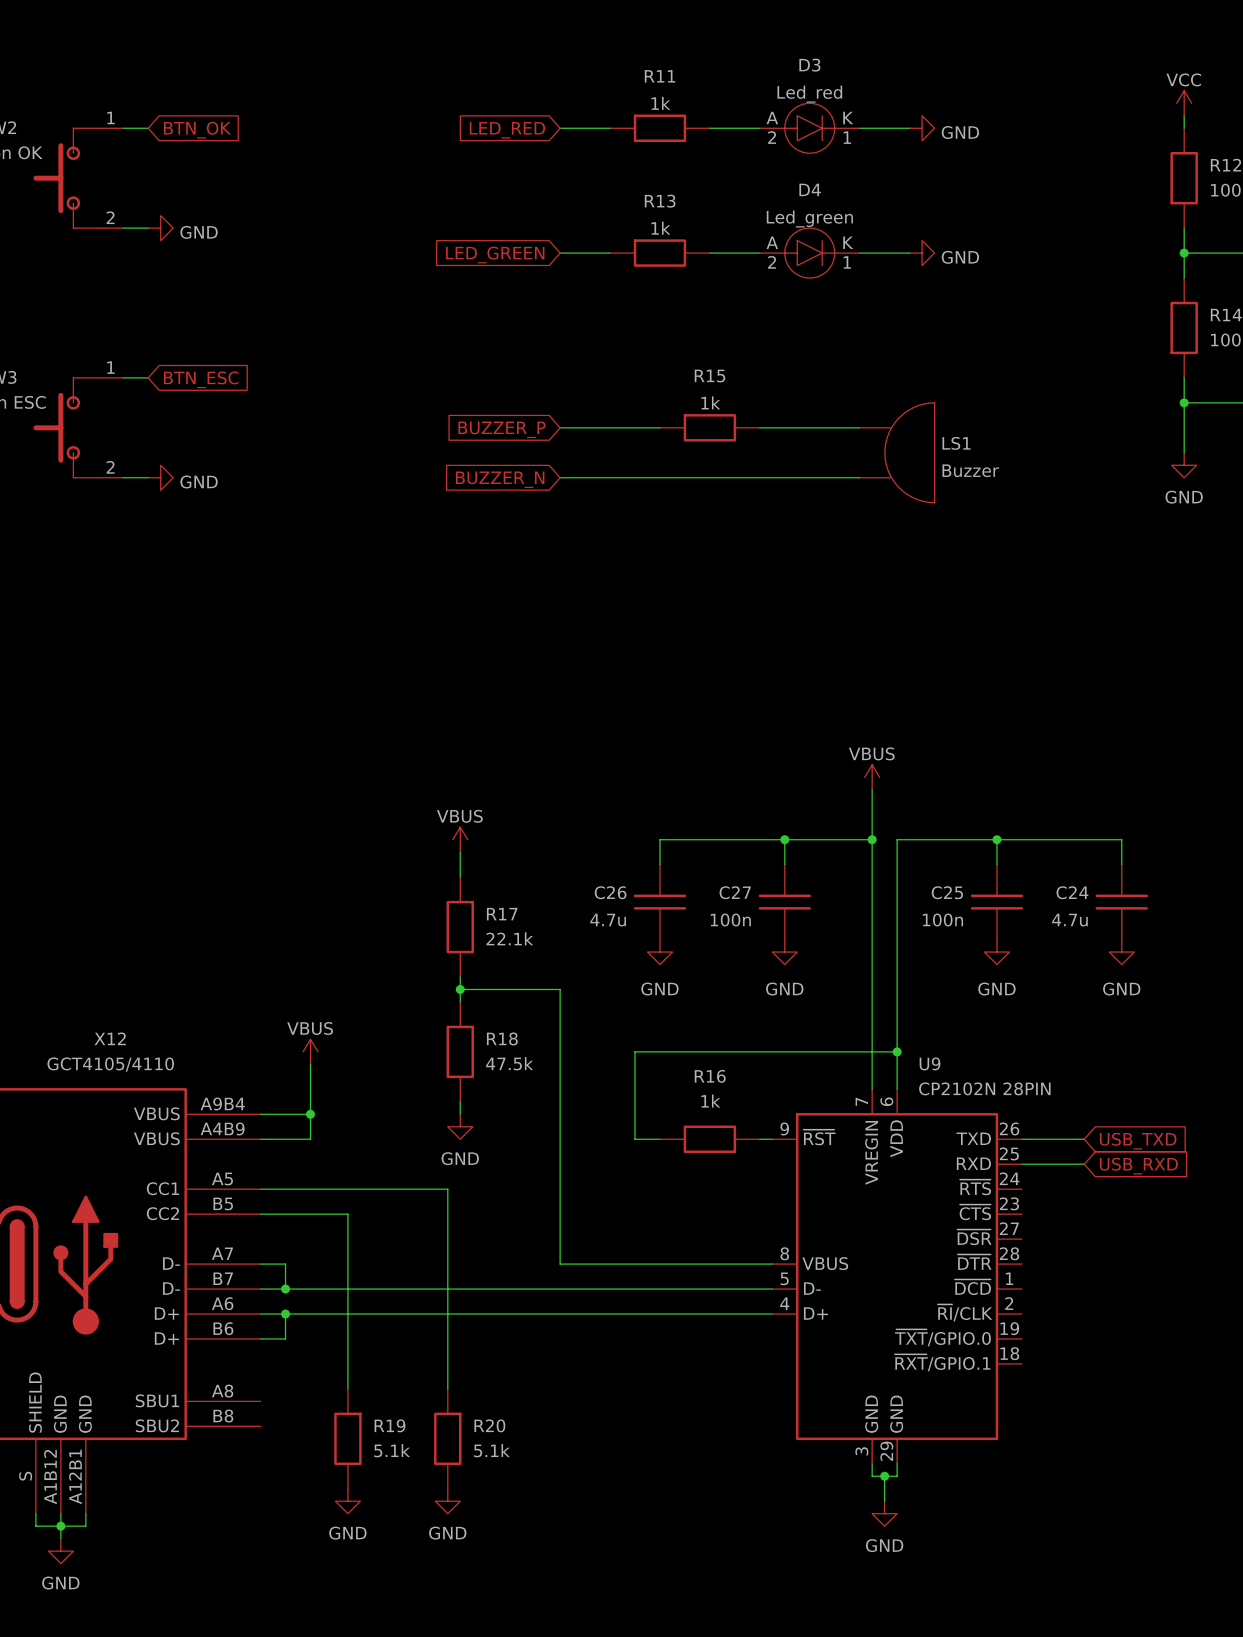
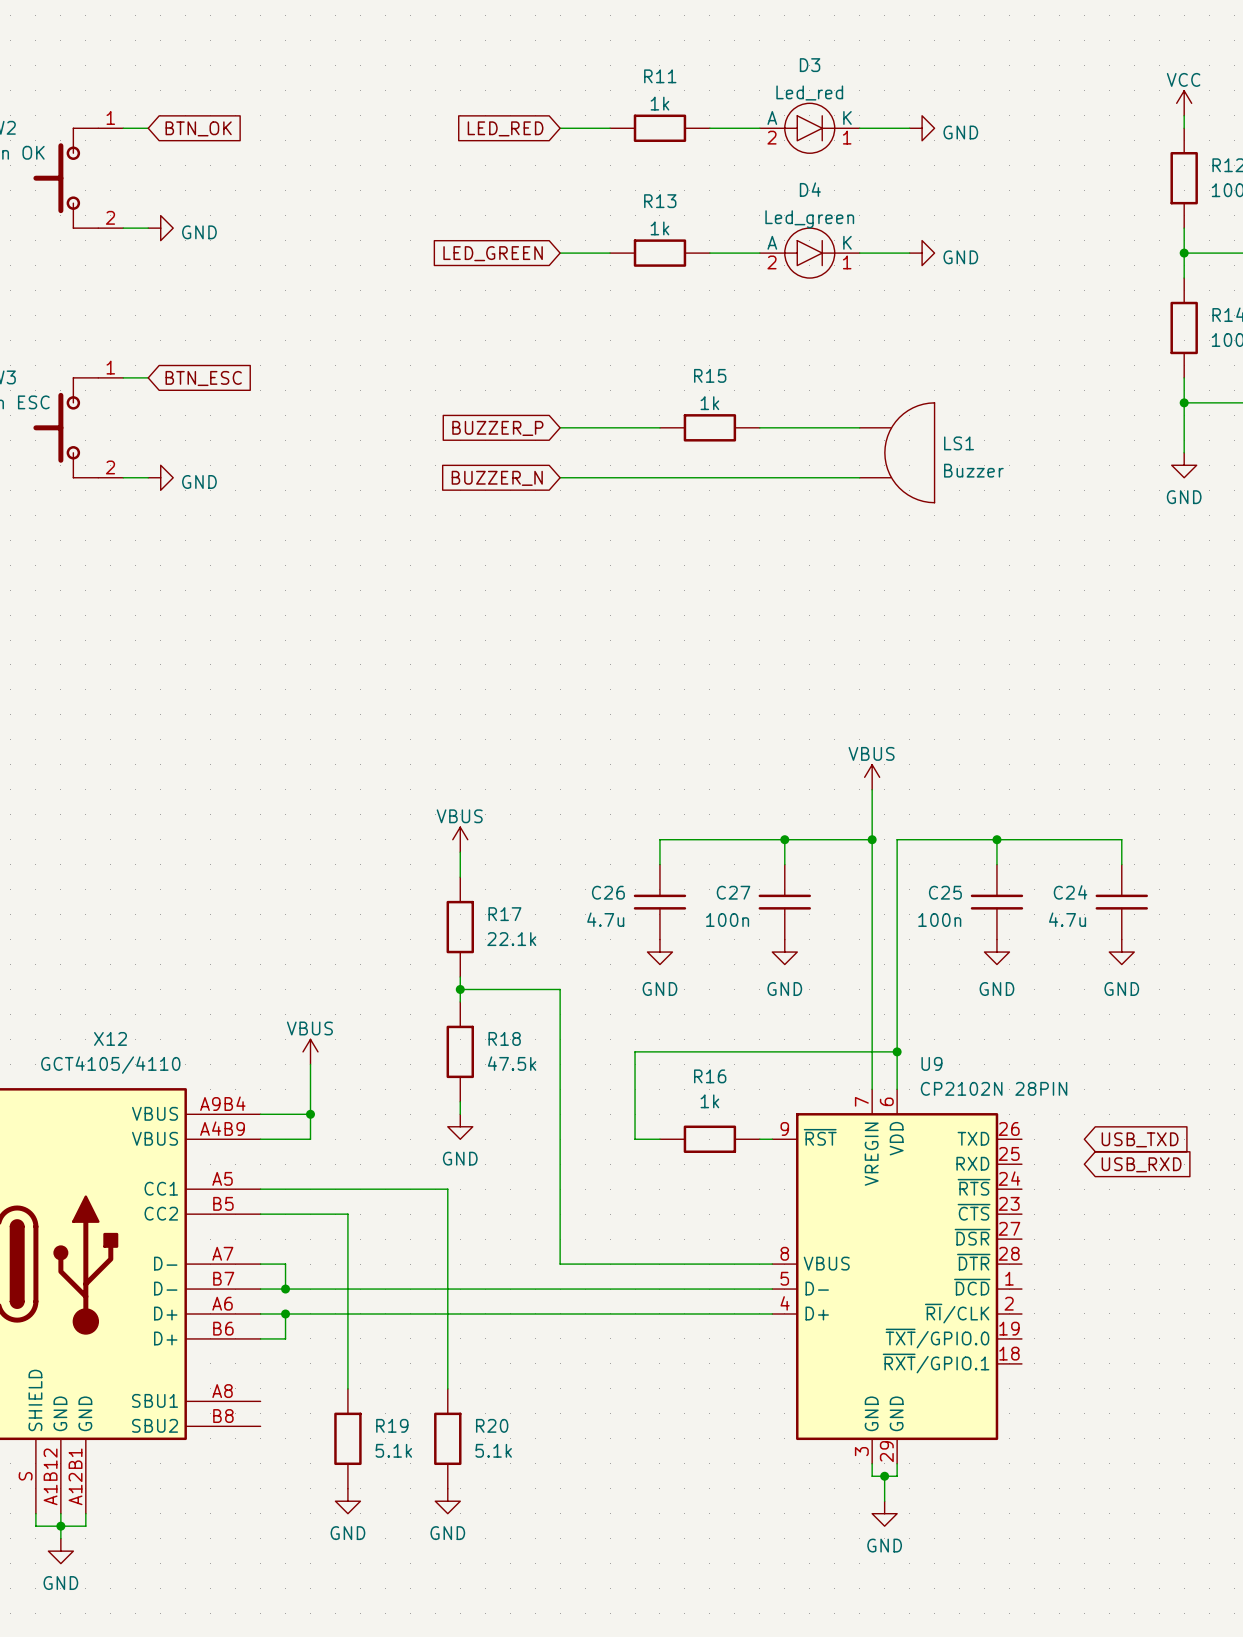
wire: (1021, 1139) (1084, 1139) -> none
wire: (1021, 1164) (1084, 1164) -> none

